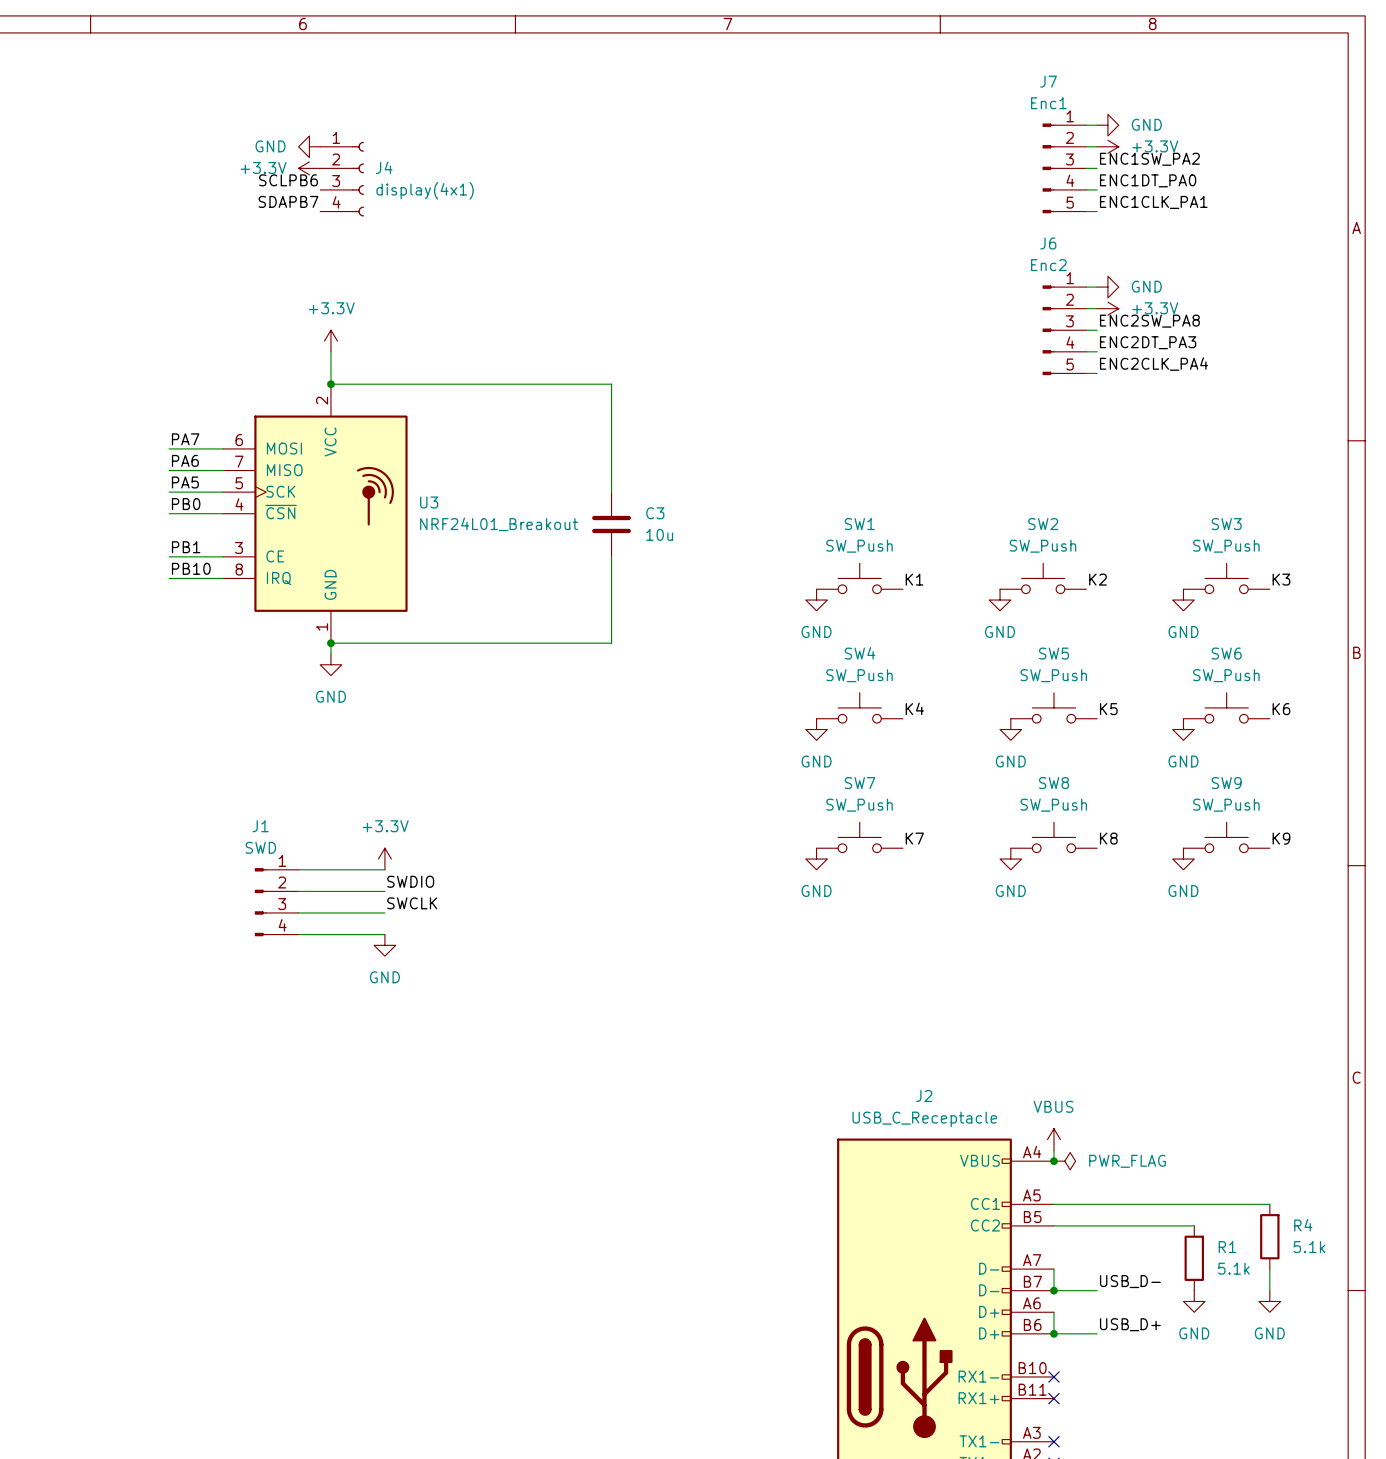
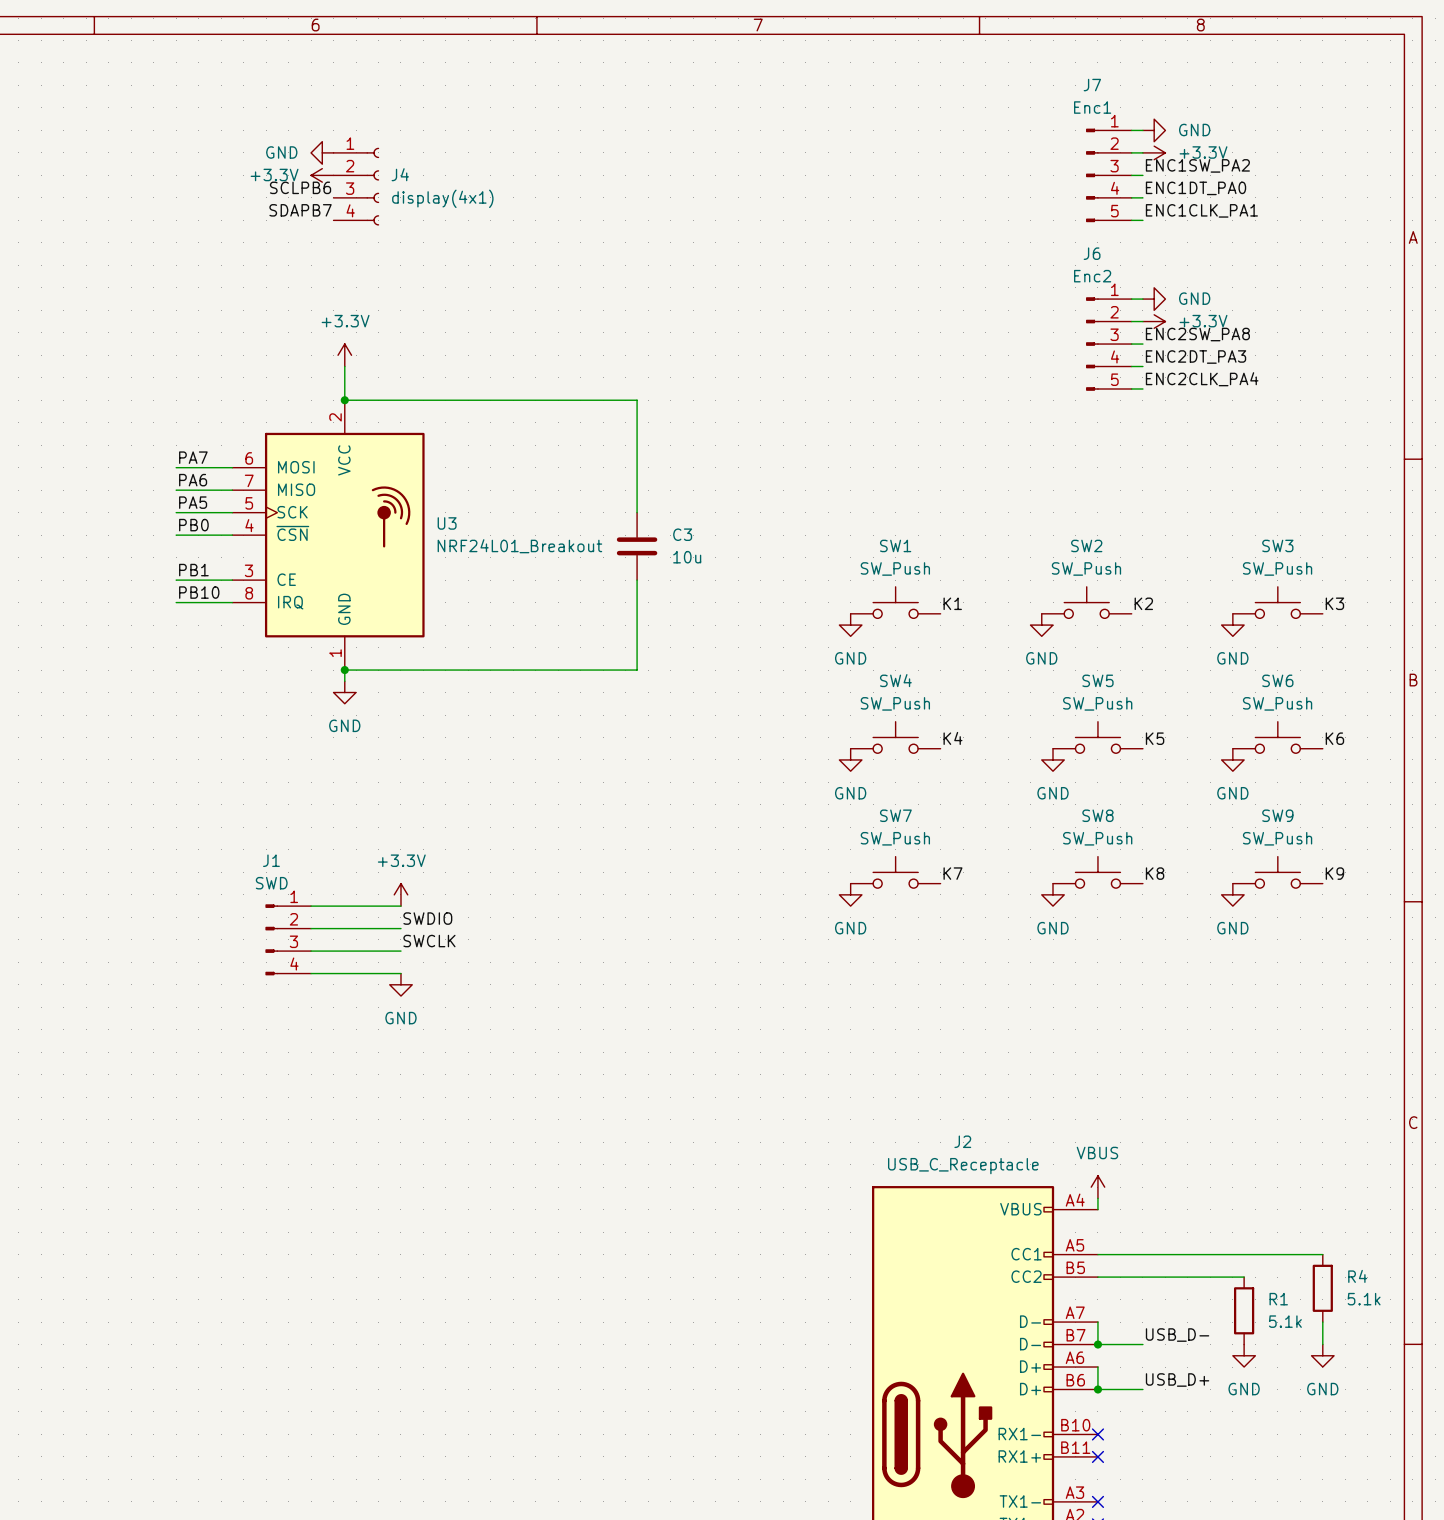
junction: (1053, 1161) -> none
power symbol: PWR_FLAG (1064, 1161) -> none

